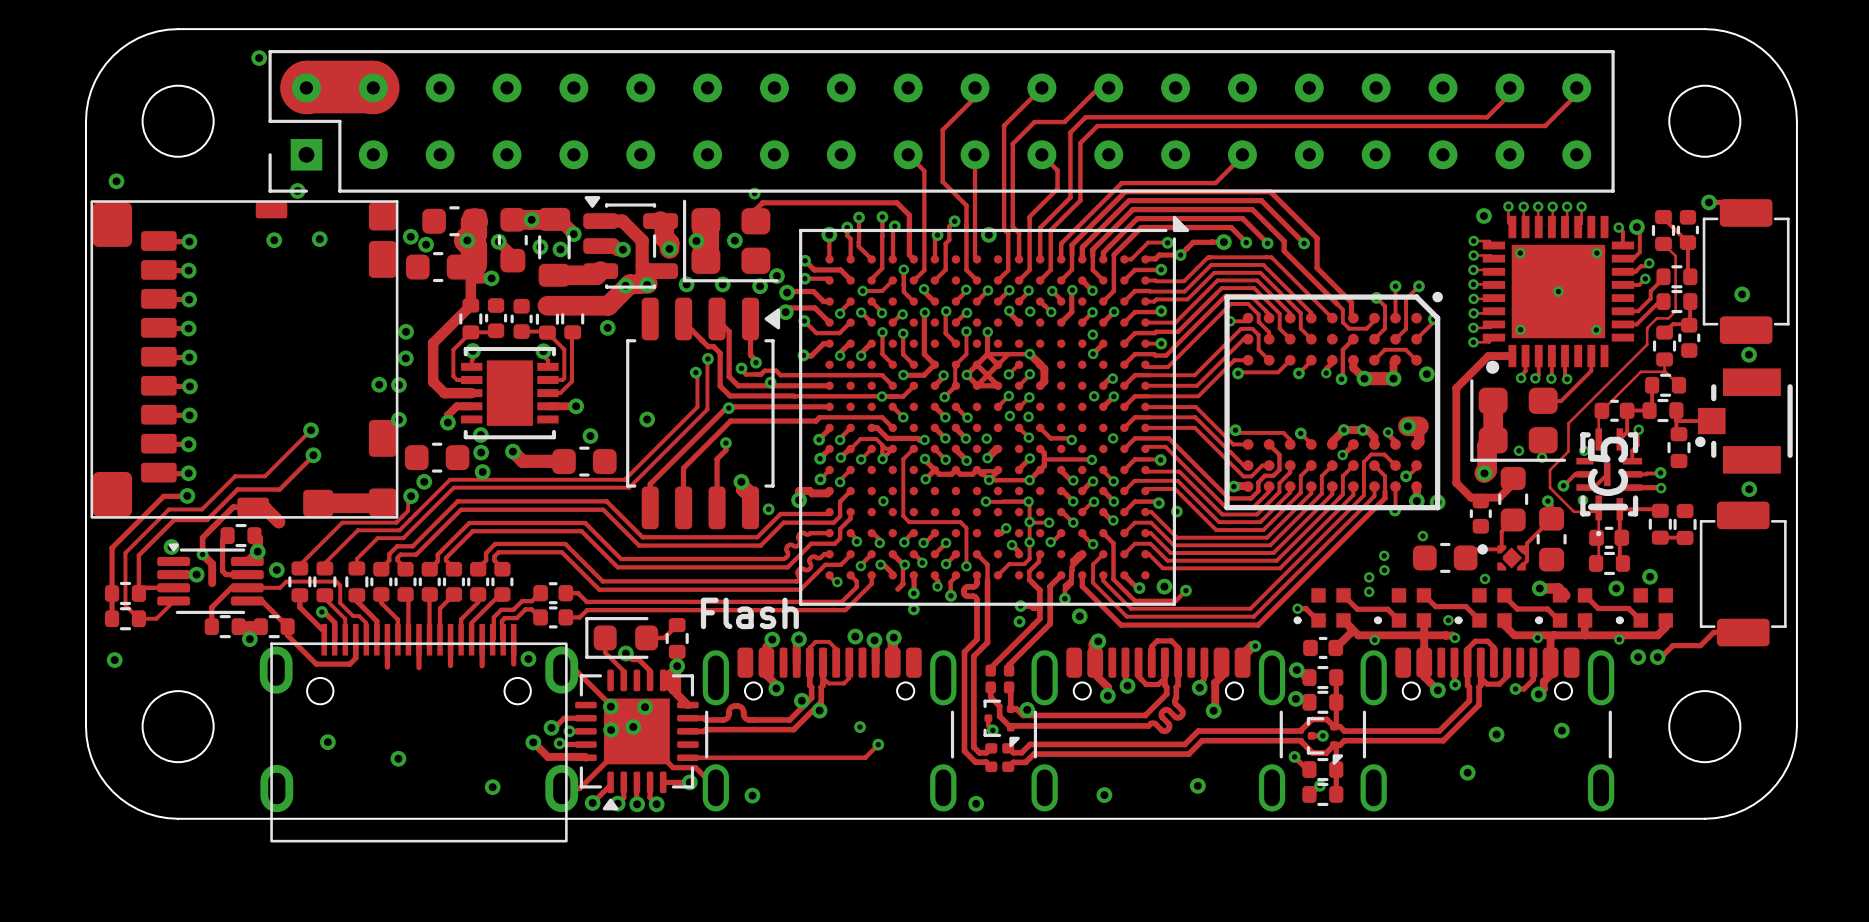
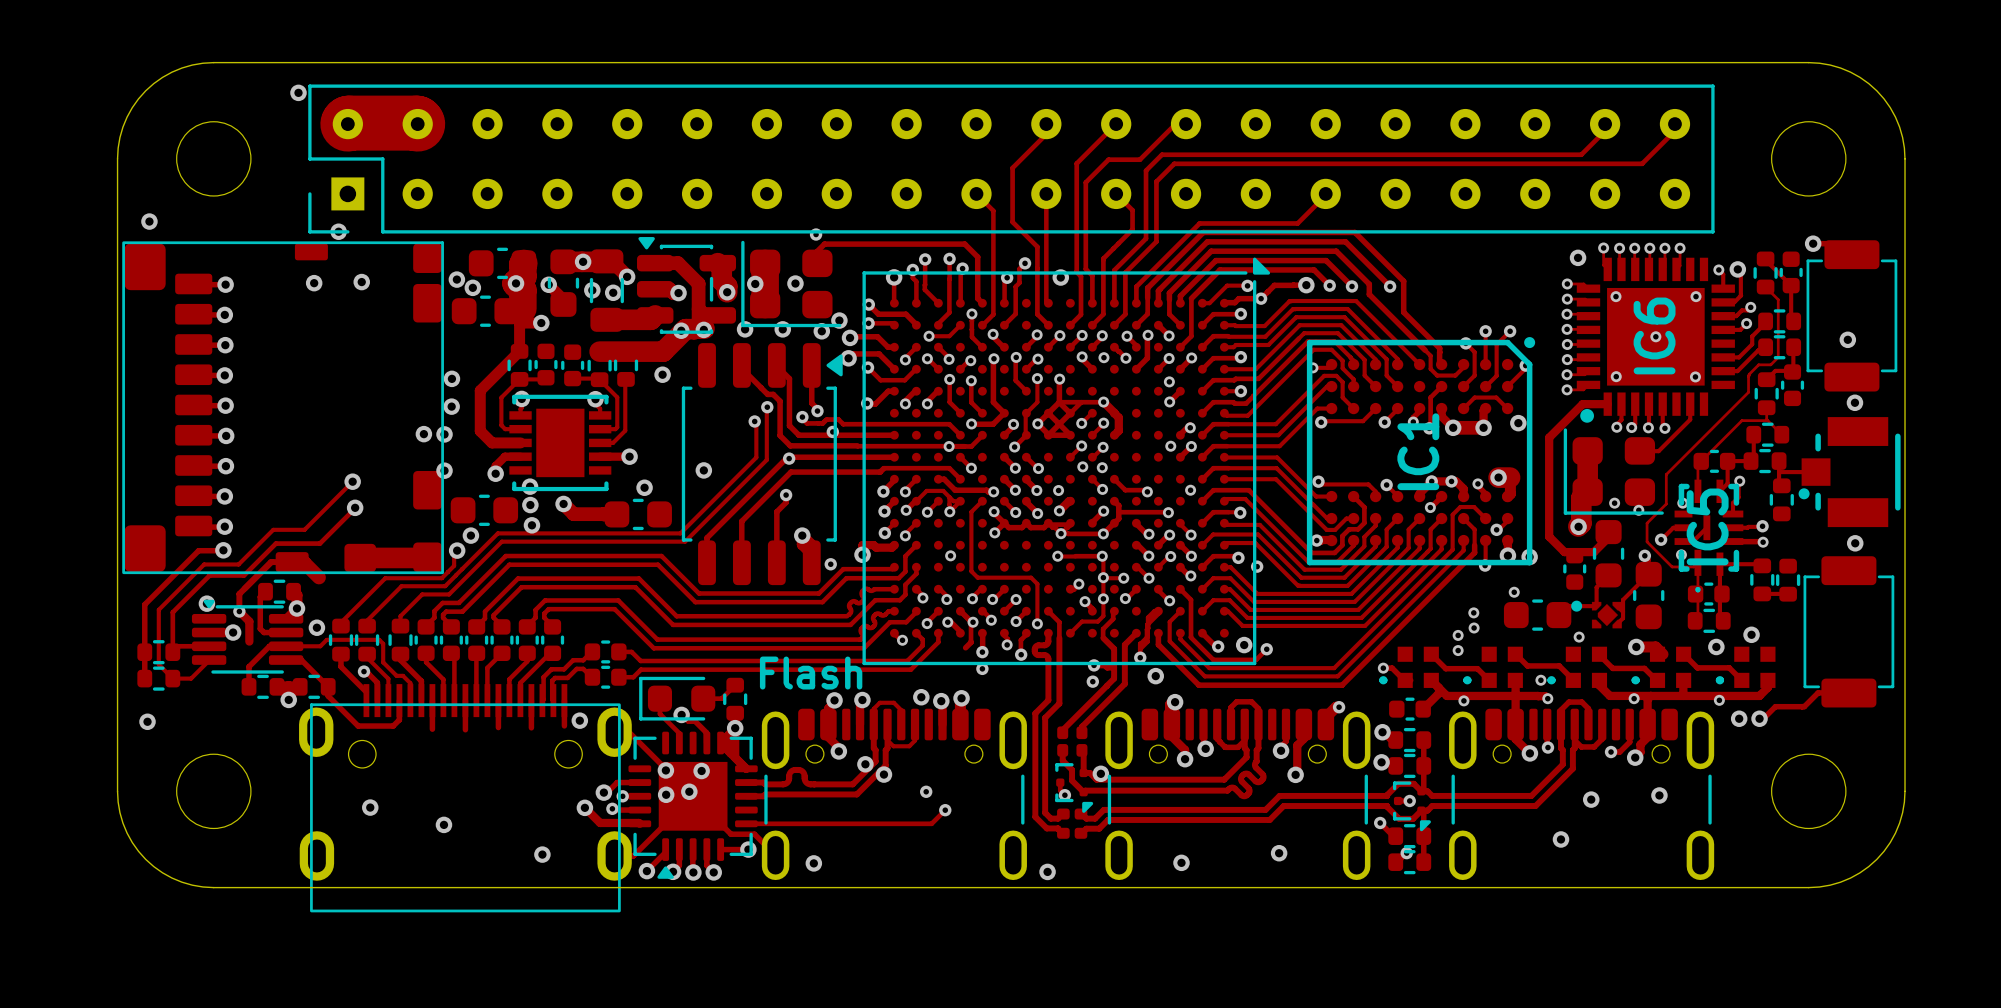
IC6 name: none -> IC6 (1654, 335)
IC1 name: none -> IC1 (1418, 451)

